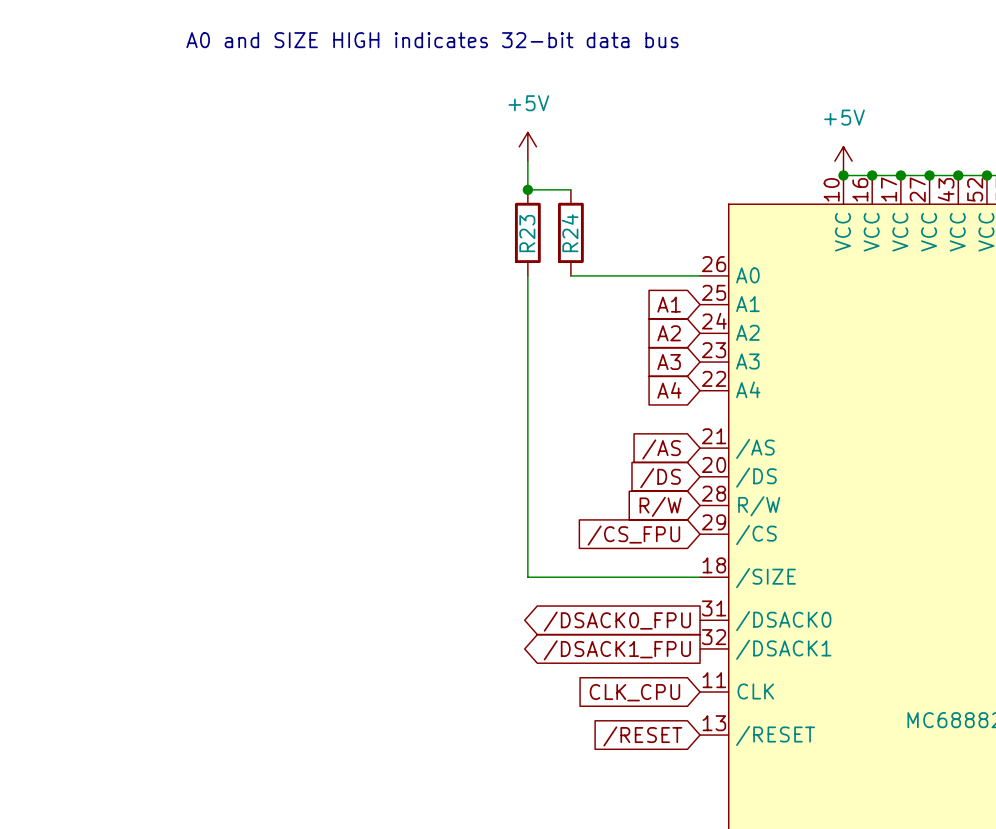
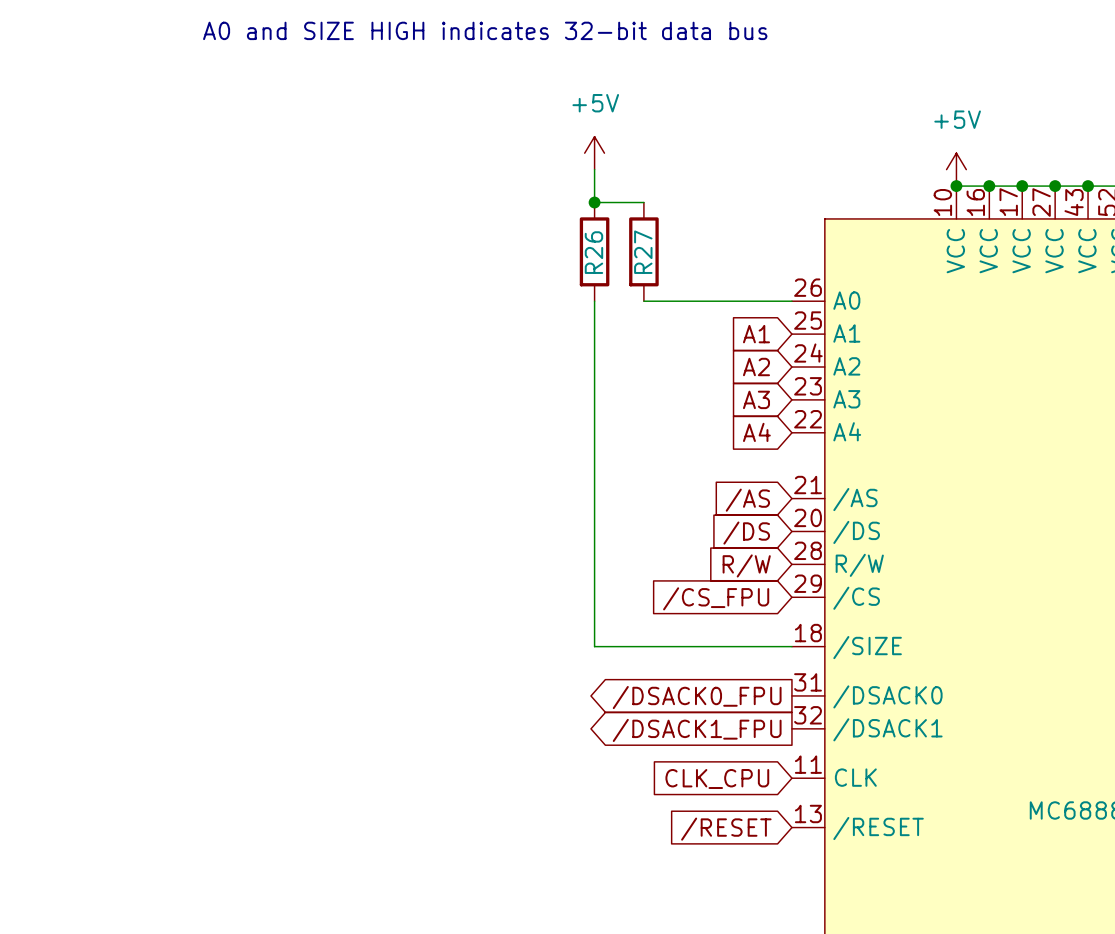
R23 name: R23 (527, 233) -> R26 (593, 252)
R24 name: R24 (570, 233) -> R27 (643, 252)

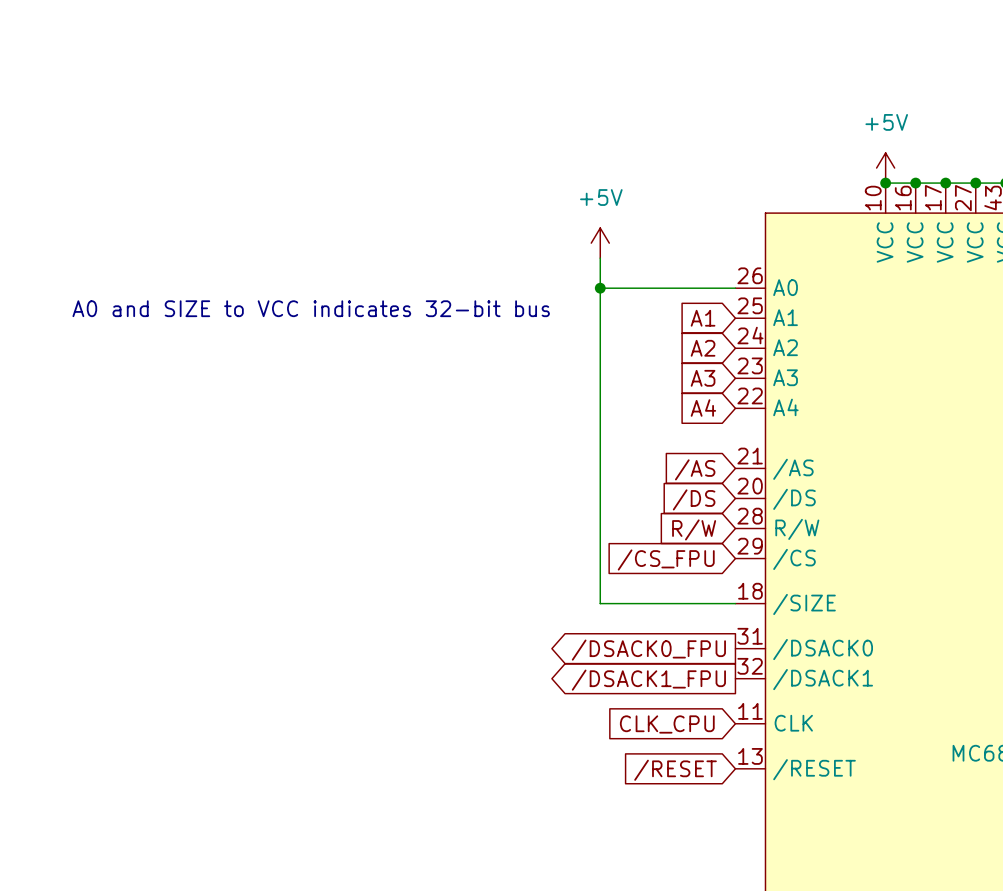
text: A0 and SIZE HIGH indicates 32-bit data bus (485, 30) -> none
power symbol position: +5V (594, 153) -> +5V (600, 243)
wire: (594, 169) (594, 202) (643, 202) -> none
junction: (594, 202) -> none
R26: (594, 251) -> none
R27: (643, 251) -> none
wire: (594, 301) (594, 646) (643, 646) -> (600, 258) (600, 603)
junction: none -> (600, 288)
text: none -> A0 and SIZE to VCC indicates 32-bit bus (311, 308)

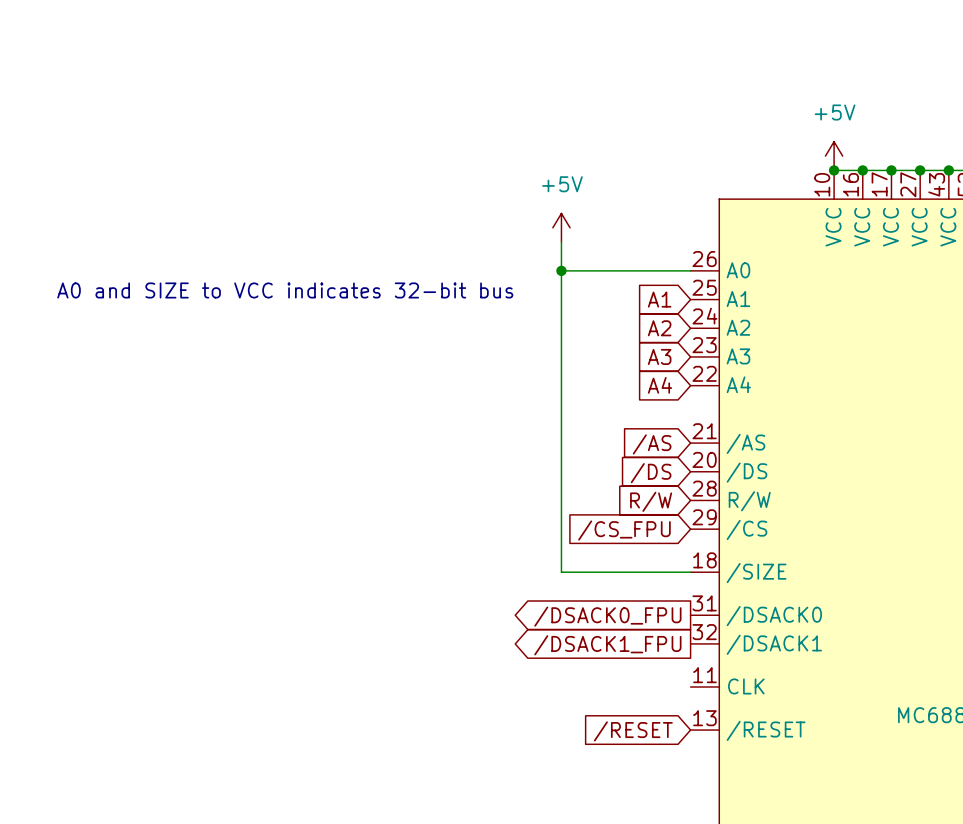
global label: CLK_CPU (667, 724) -> none

